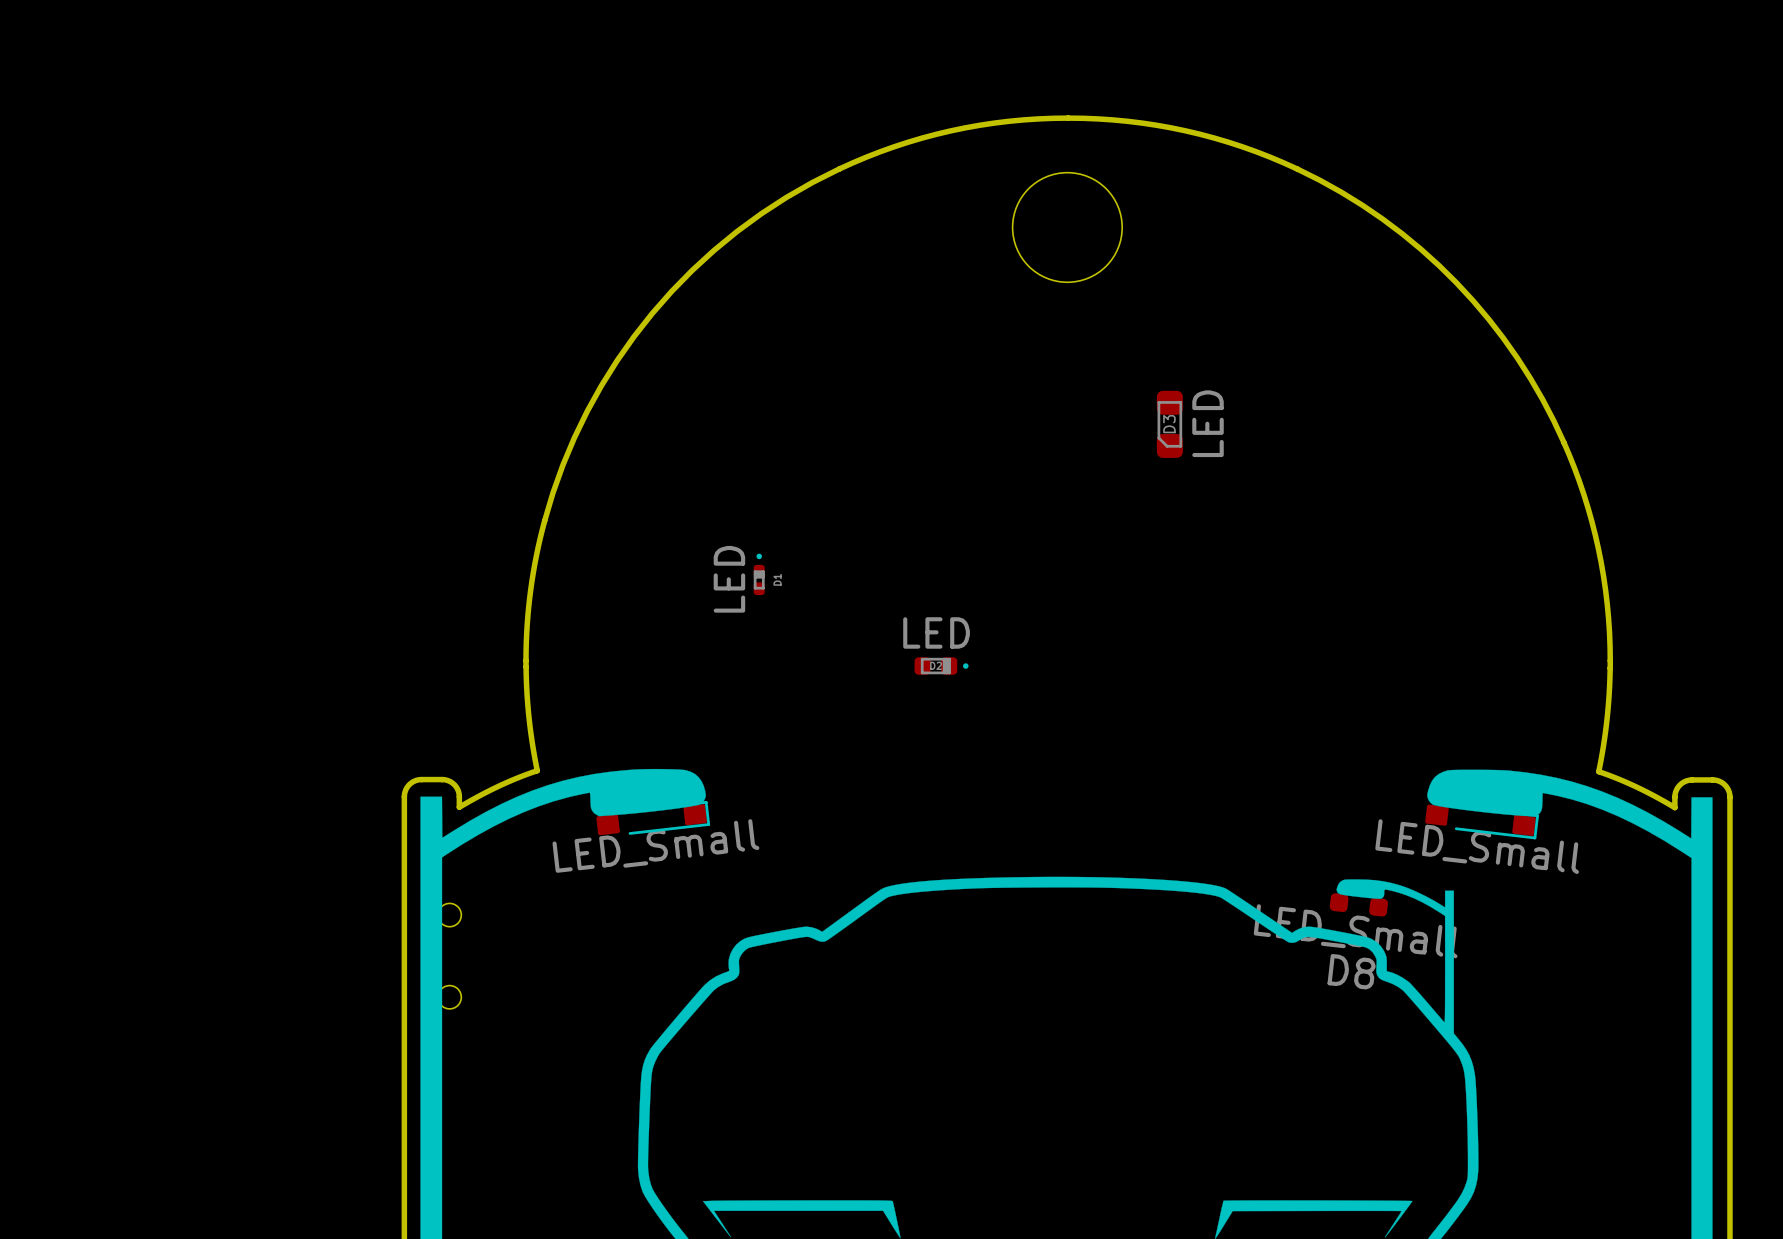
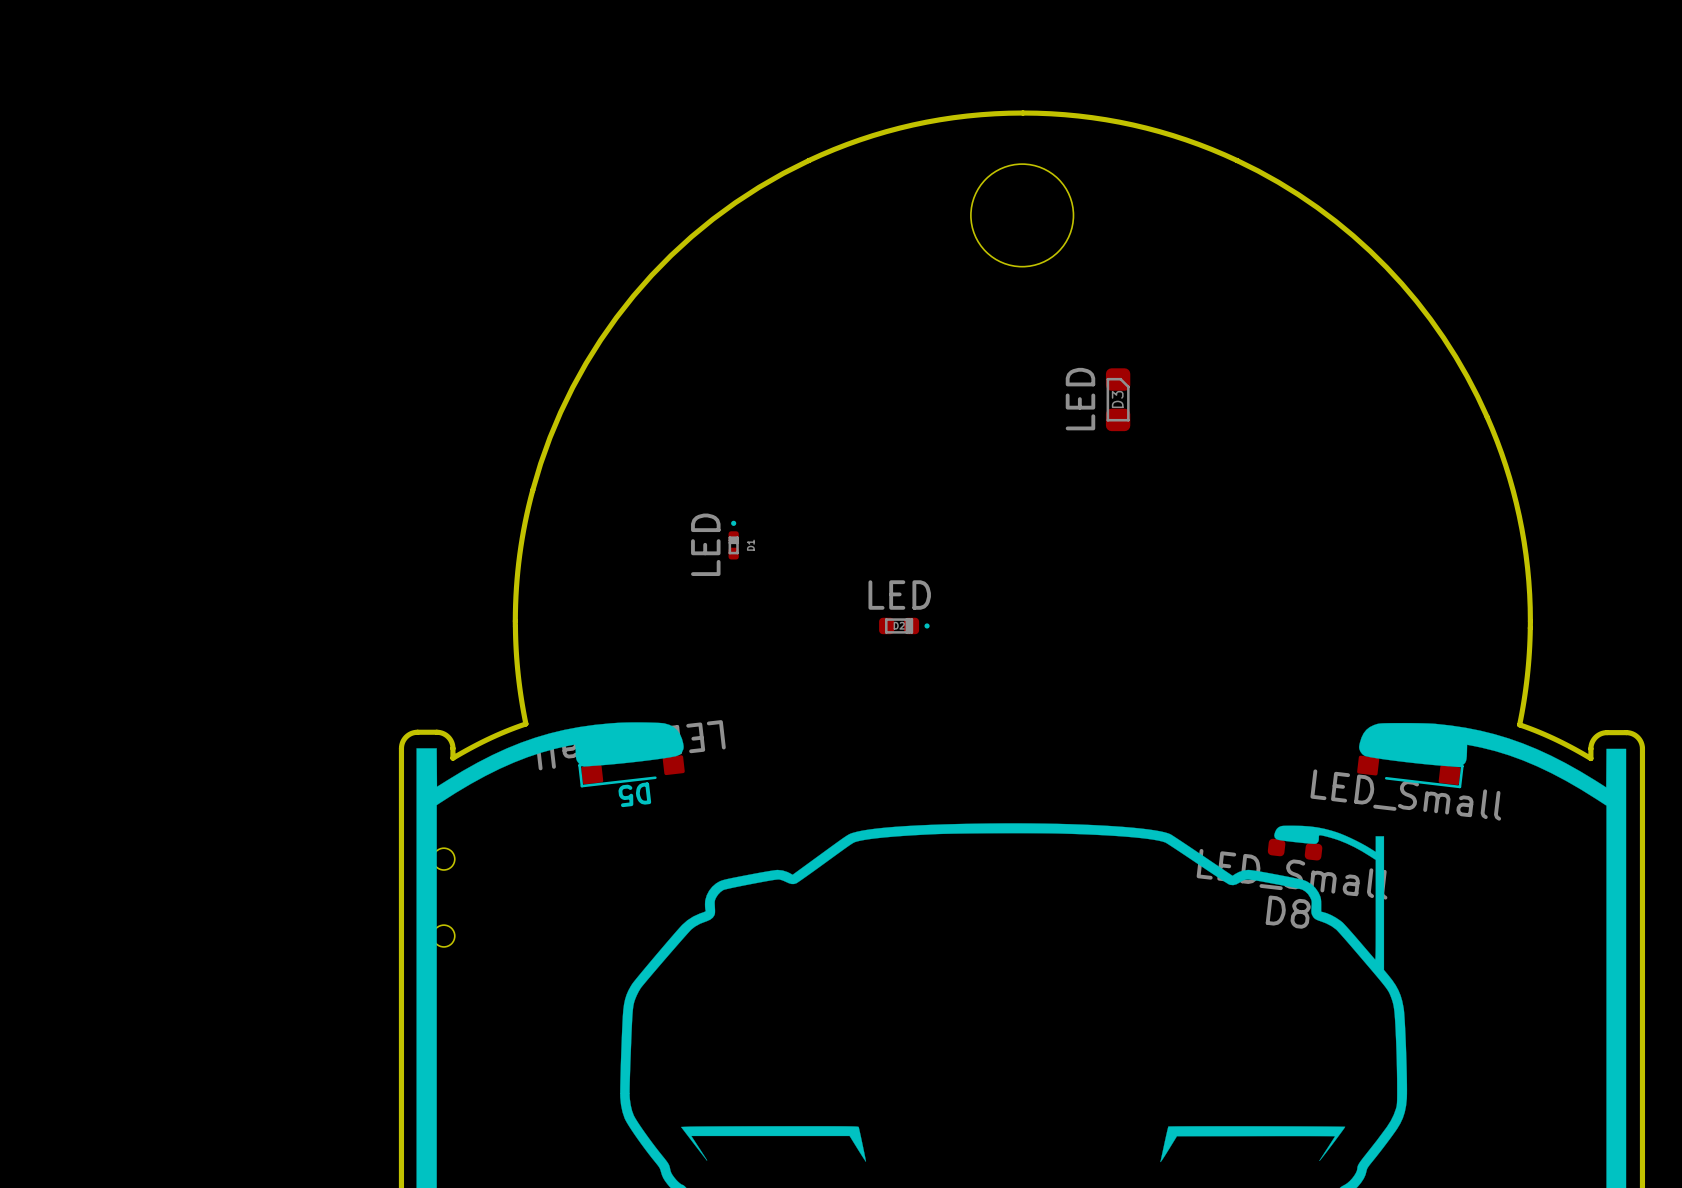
D3 rotation: 0° (1169, 424) -> 180° (1118, 399)
D5 rotation: 0° (653, 818) -> 180° (631, 771)

